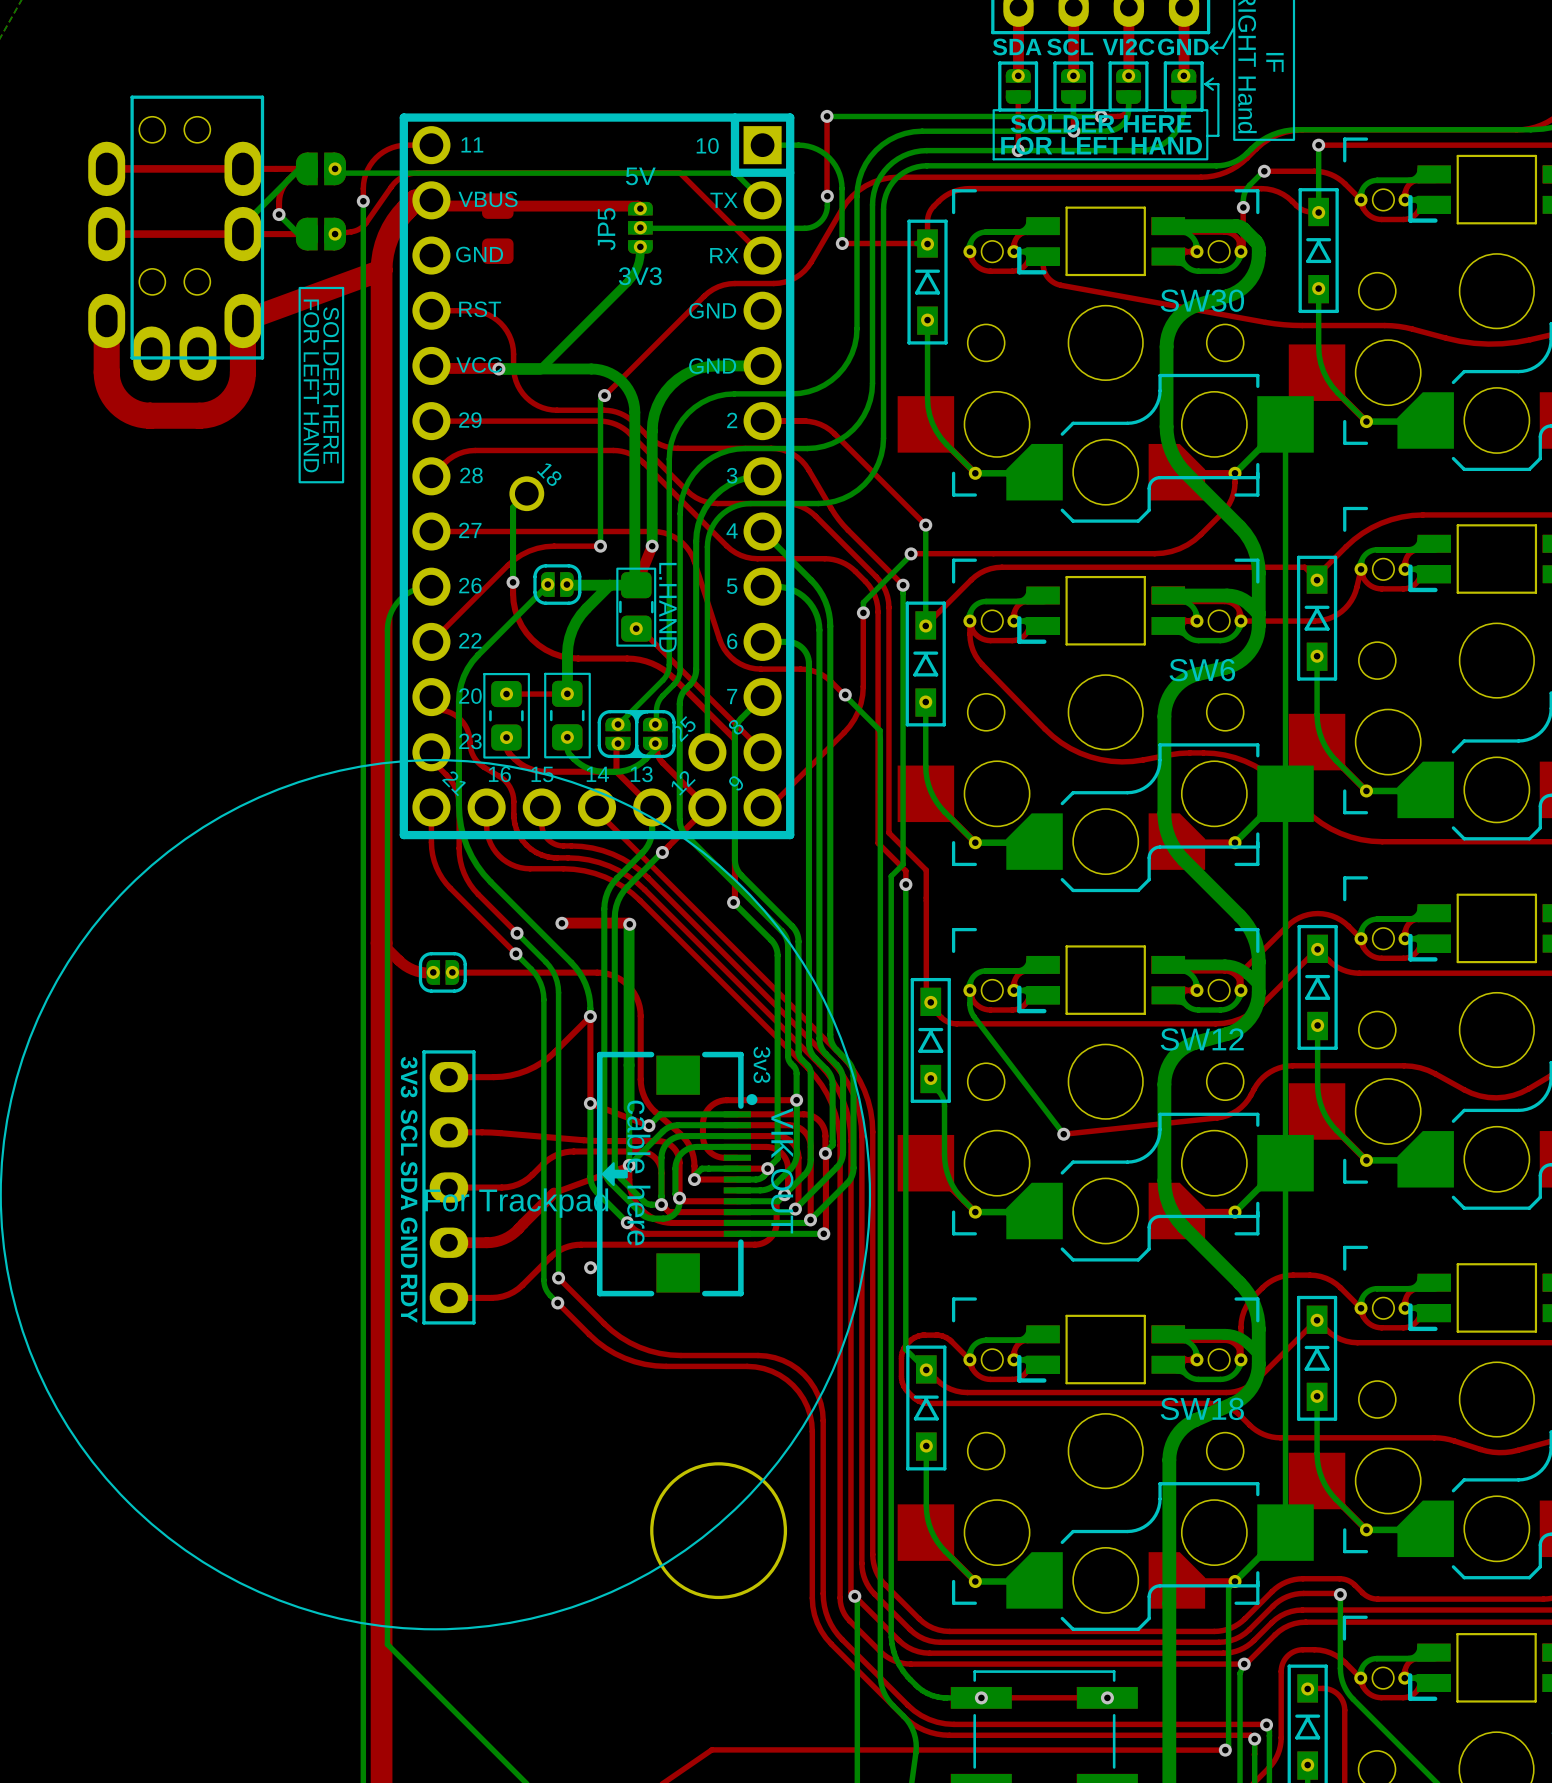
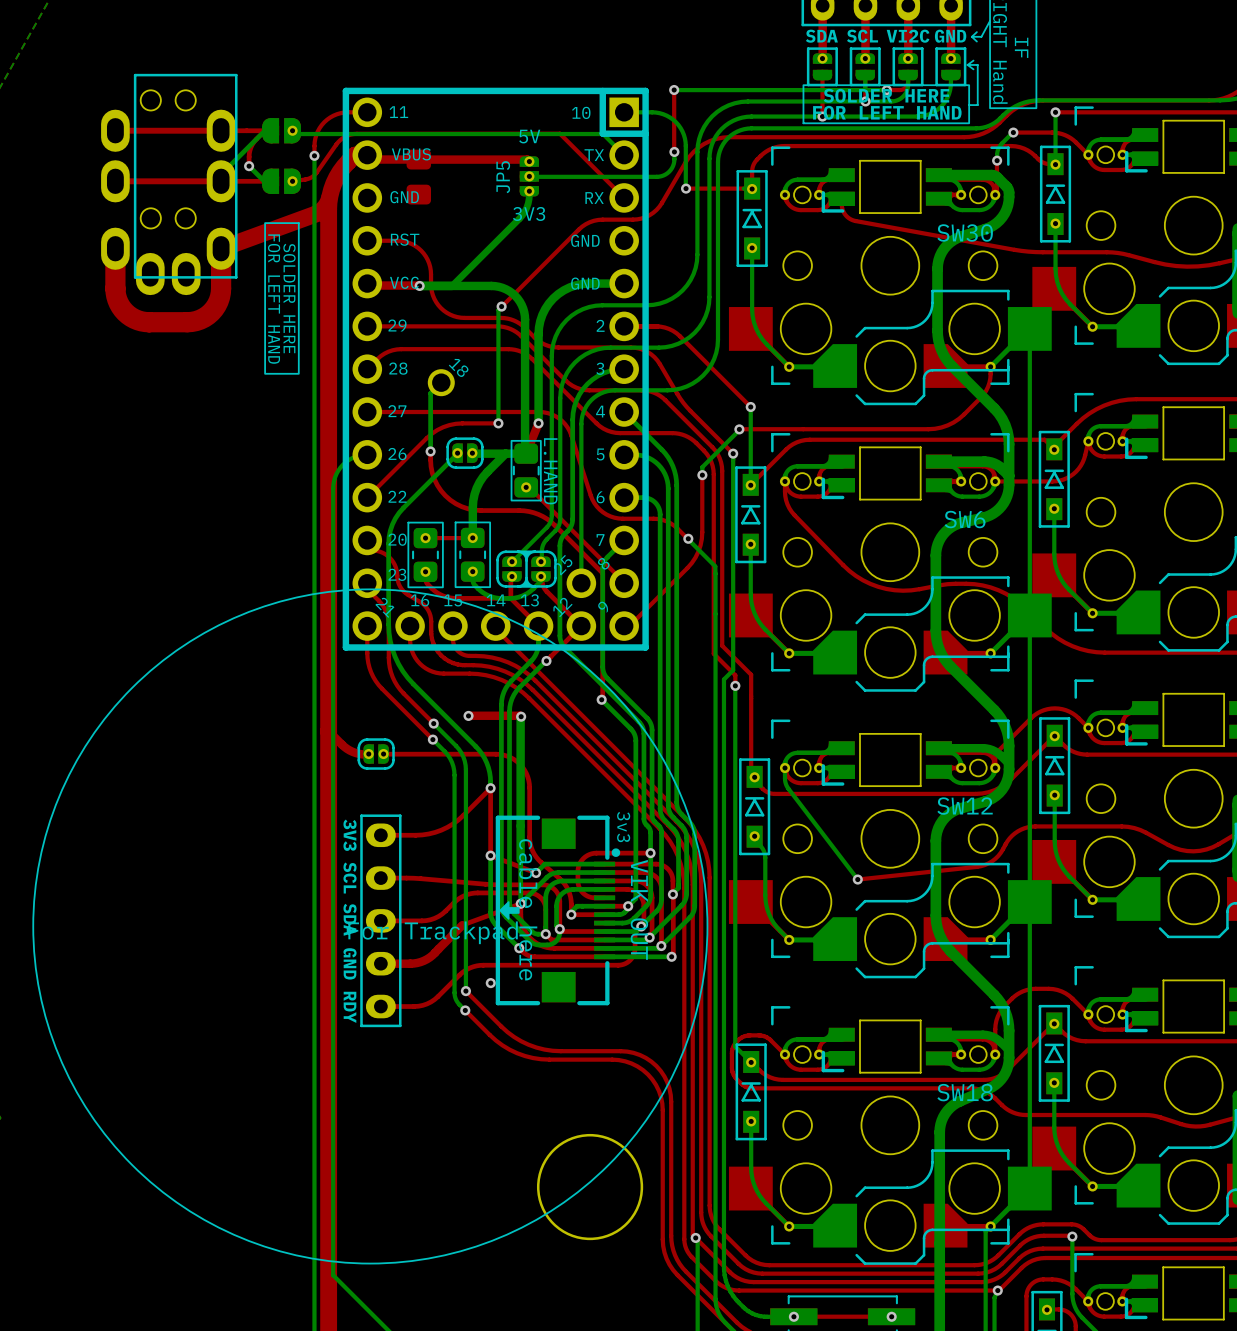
top track: none -> (322, 195) (319, 202) (312, 207)

